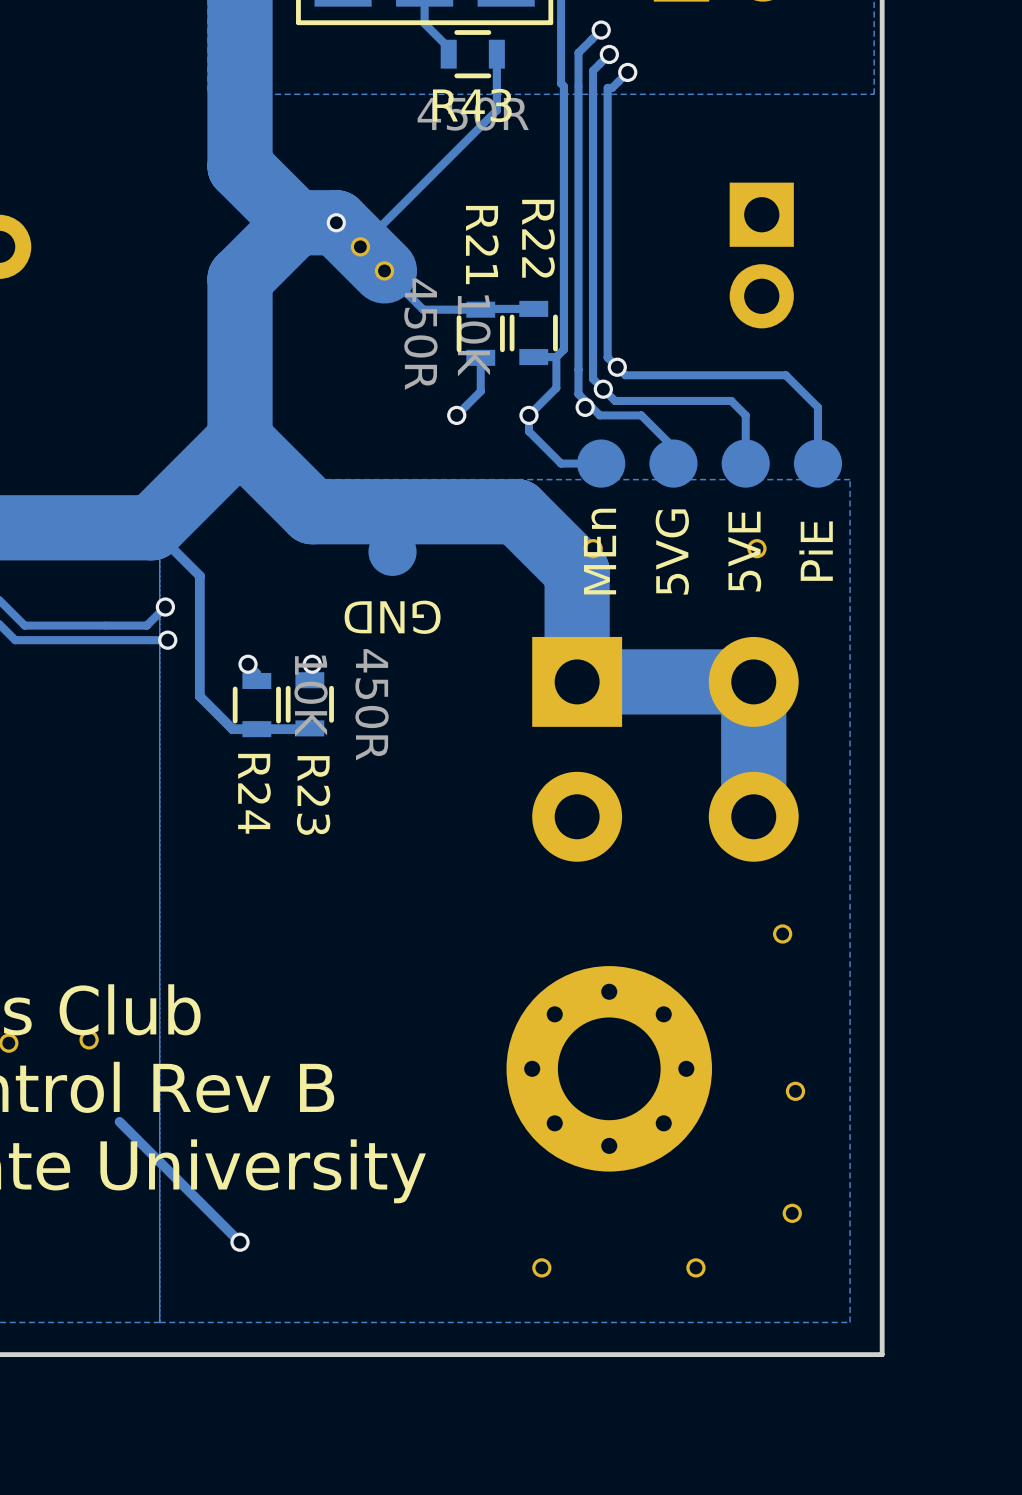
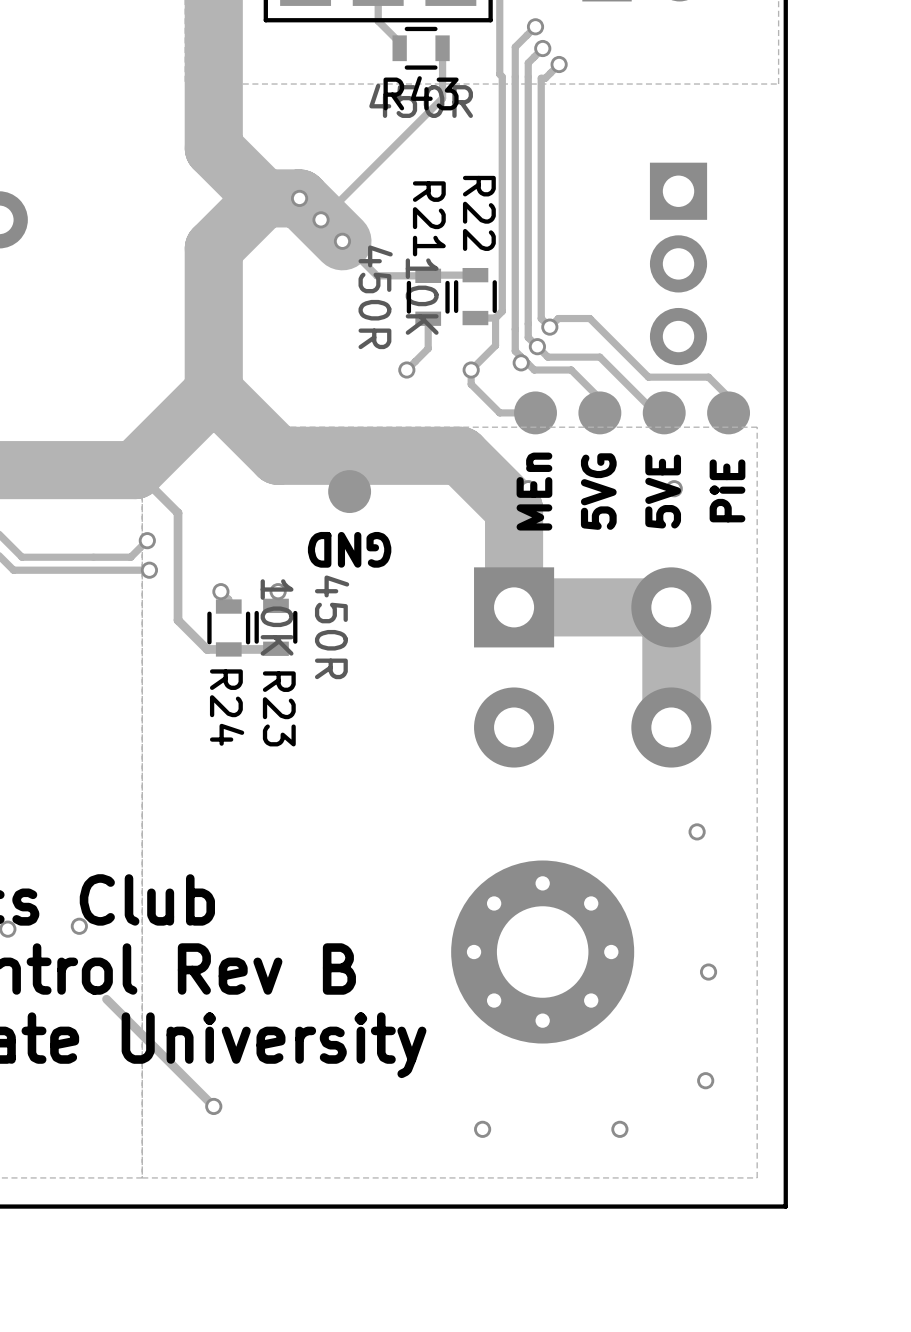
part: none -> (678, 263)
track: (617, 367) (625, 375) (785, 375) (817, 407) (817, 445) -> (549, 327) (558, 318) (589, 318) (648, 377) (708, 377) (728, 397)
track: (673, 400) (731, 400) (745, 415) (745, 463) -> (599, 357) (655, 412) (664, 412)

